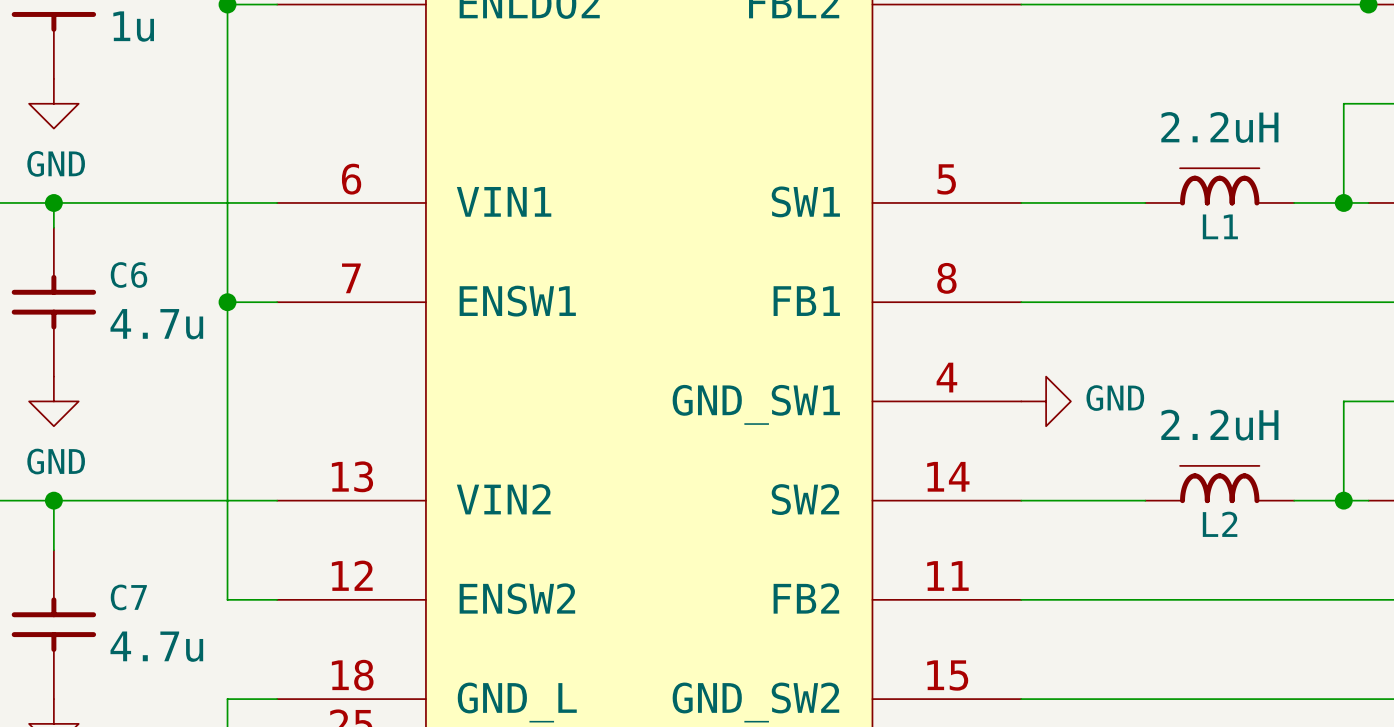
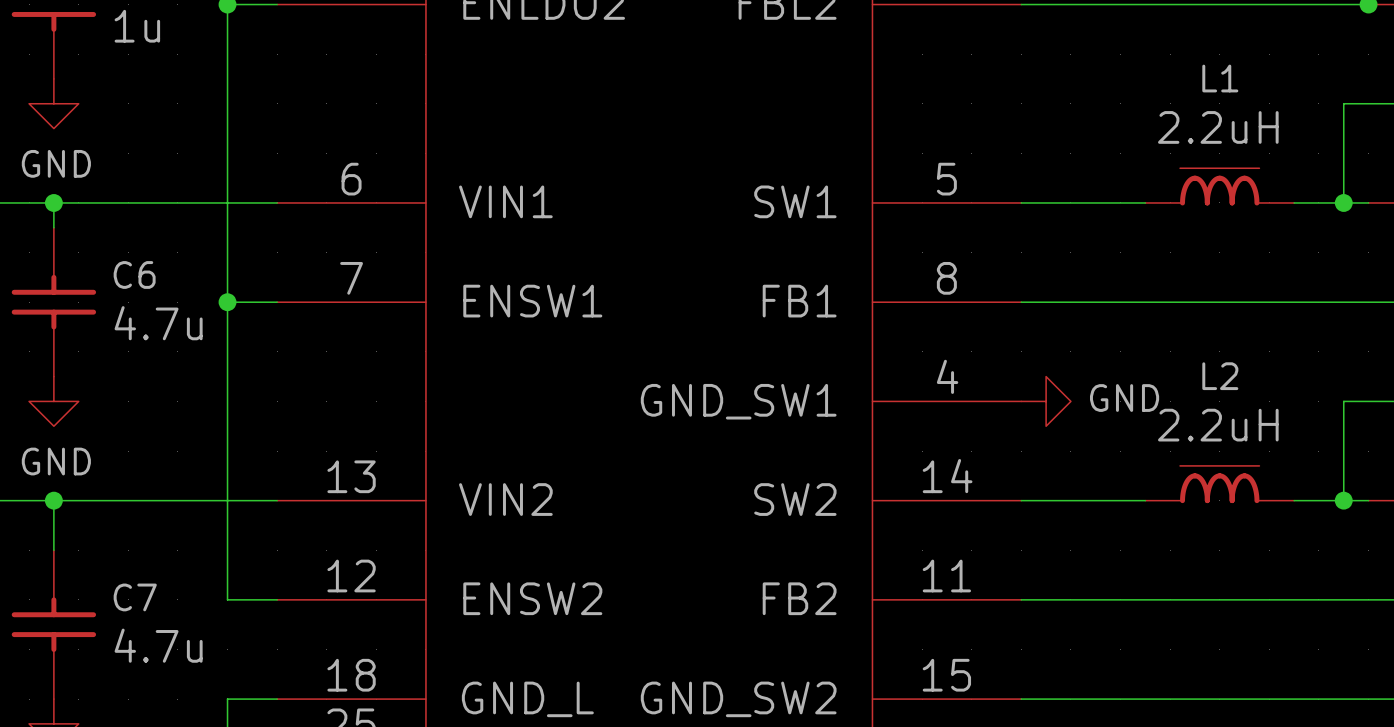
L1 name position: L1 (1220, 226) -> L1 (1220, 78)
L2 name position: L2 (1220, 524) -> L2 (1220, 376)

